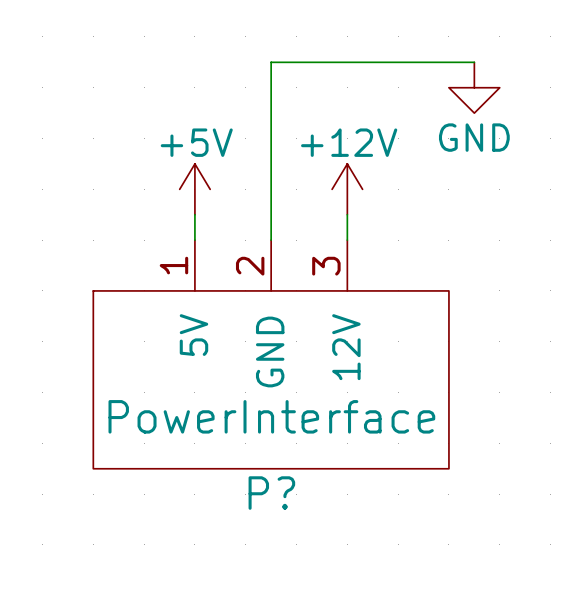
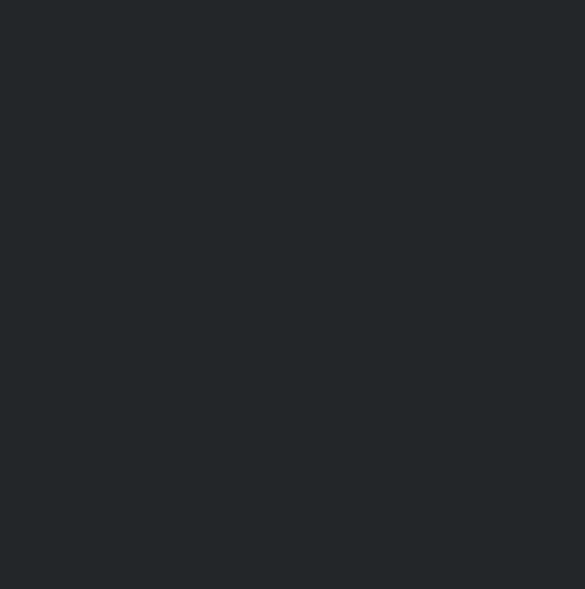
wire: (474, 62) (271, 62) (271, 240) -> none
power symbol: GND (474, 87) -> none
power symbol: +5V (194, 189) -> none
power symbol: +12V (347, 189) -> none
wire: (194, 214) (194, 240) -> none
wire: (347, 214) (347, 240) -> none
P?: PowerInterface (271, 354) -> none

